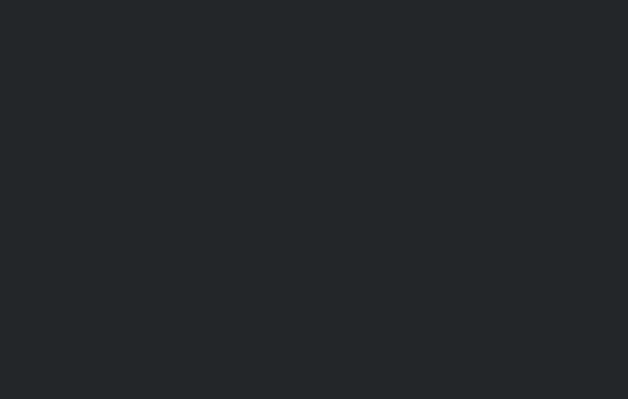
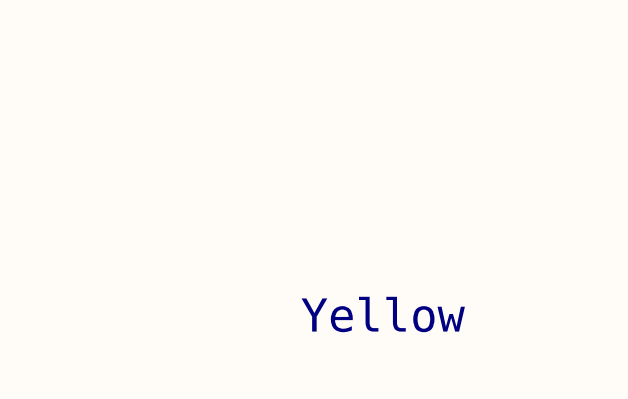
text: none -> Yellow (383, 314)

